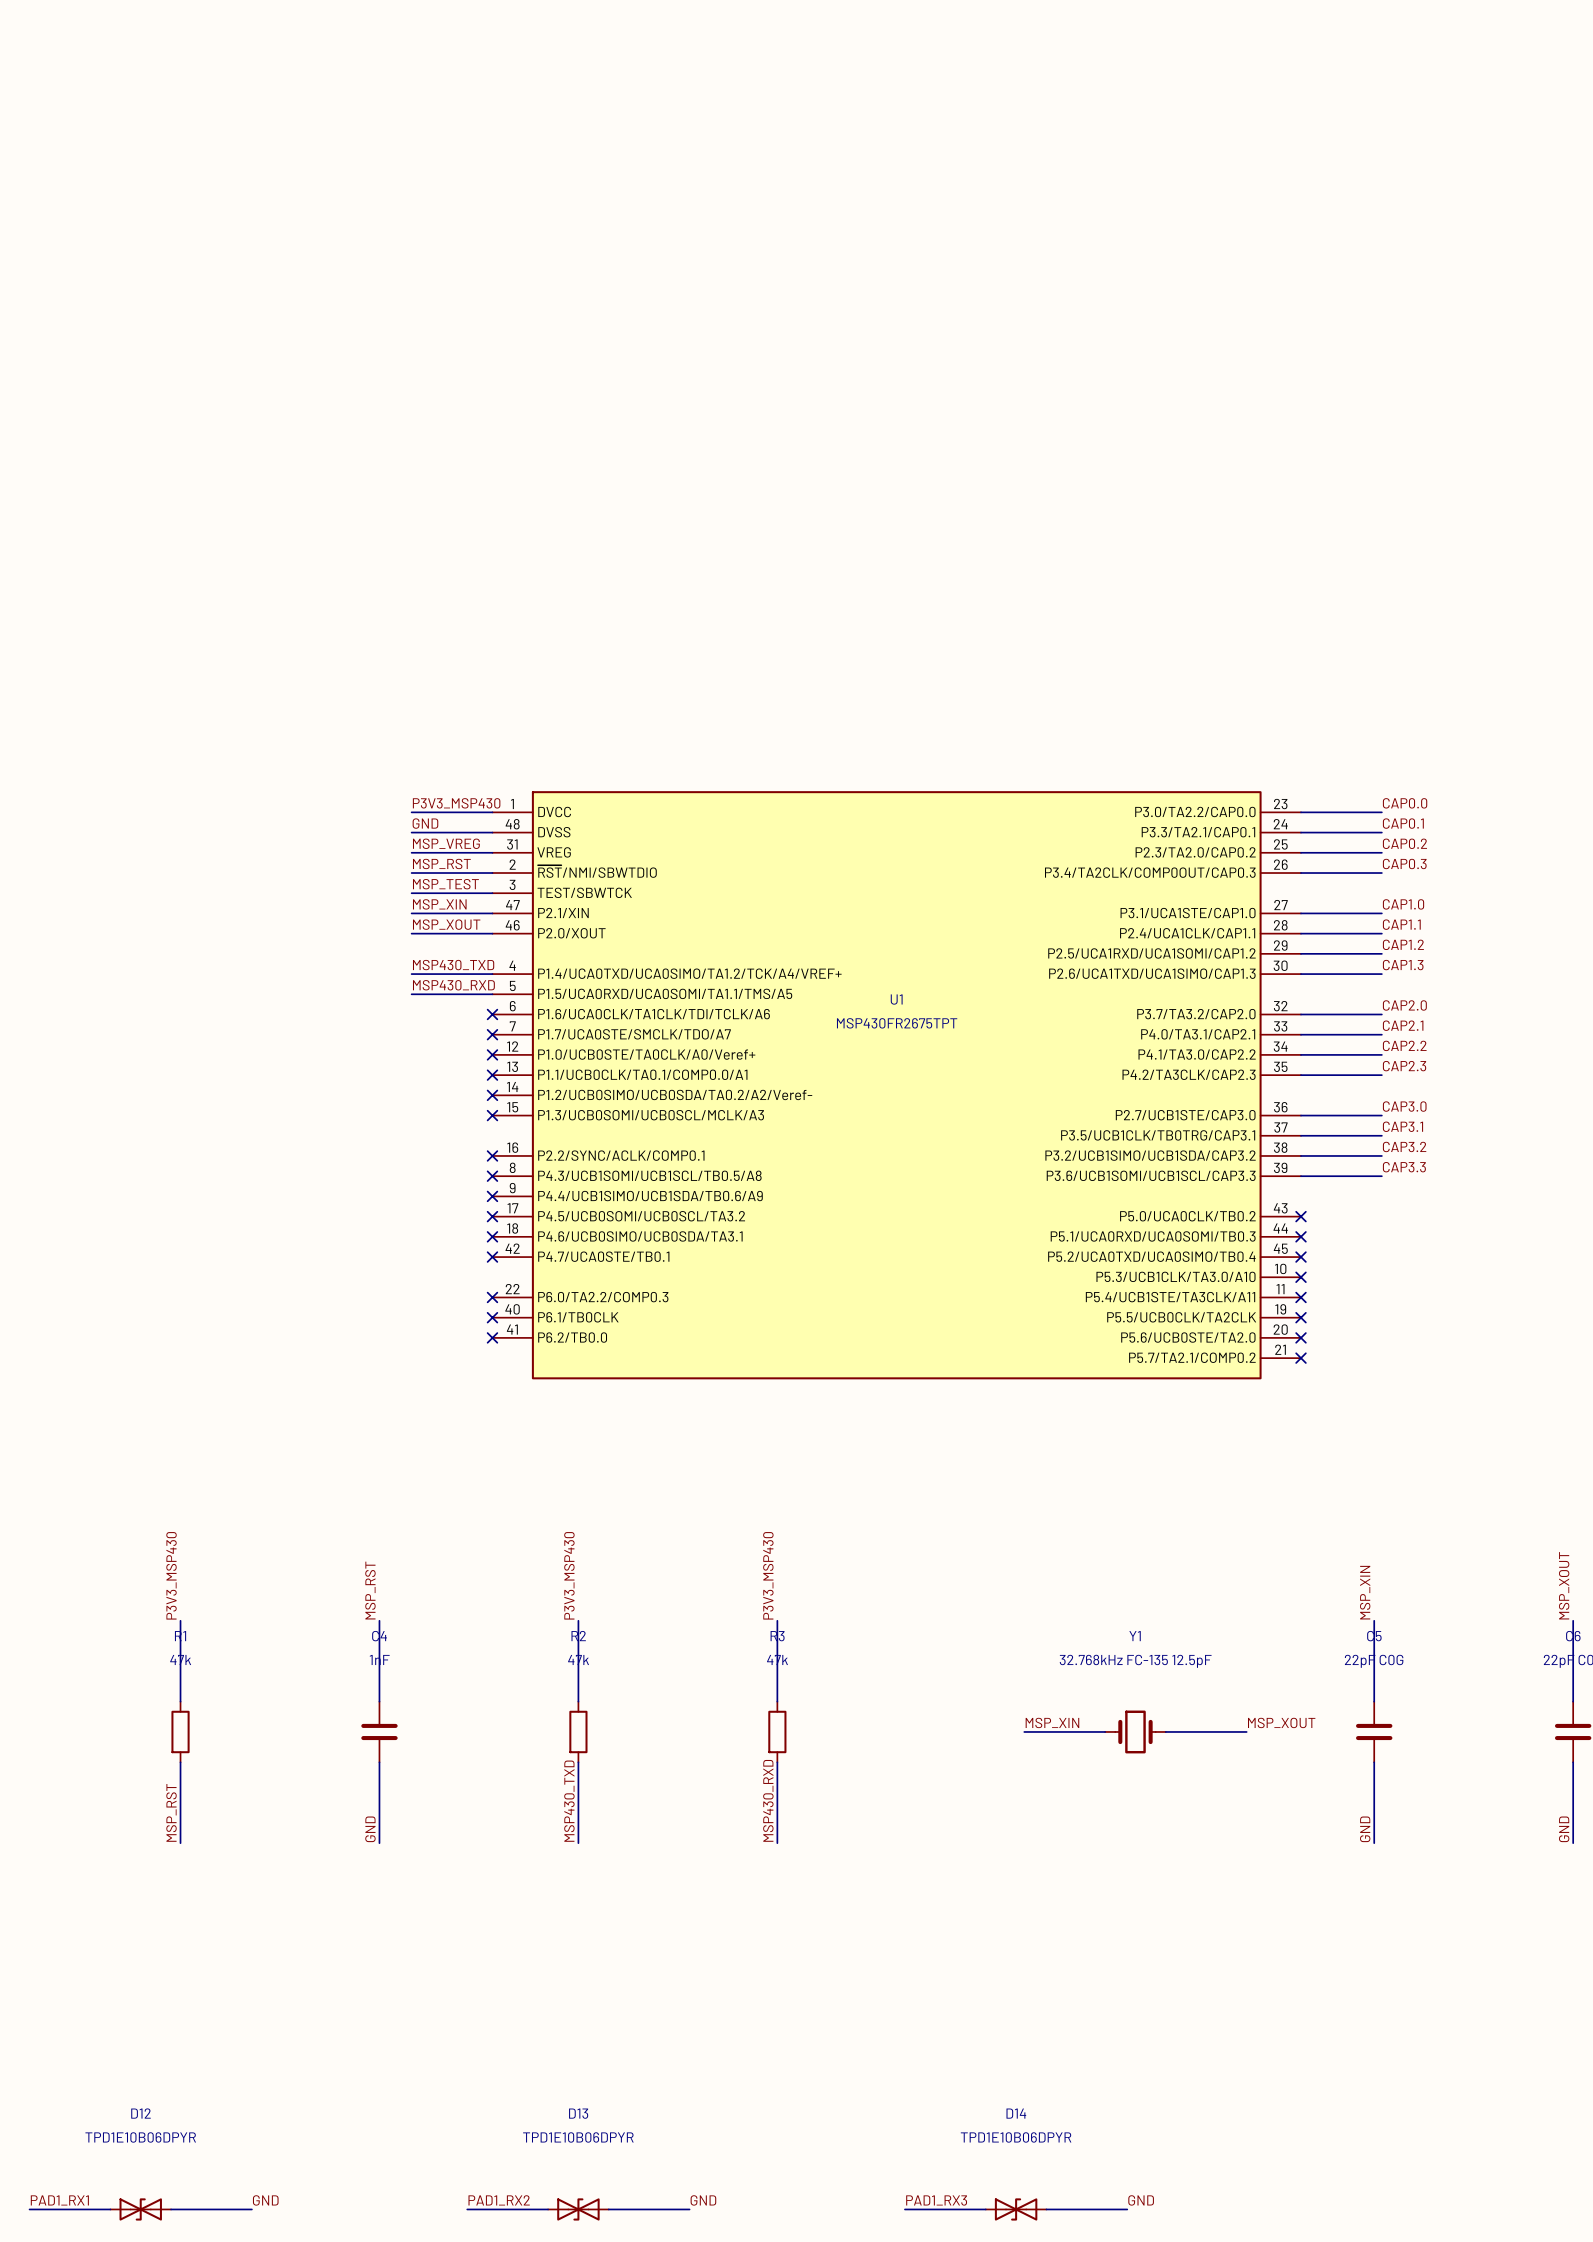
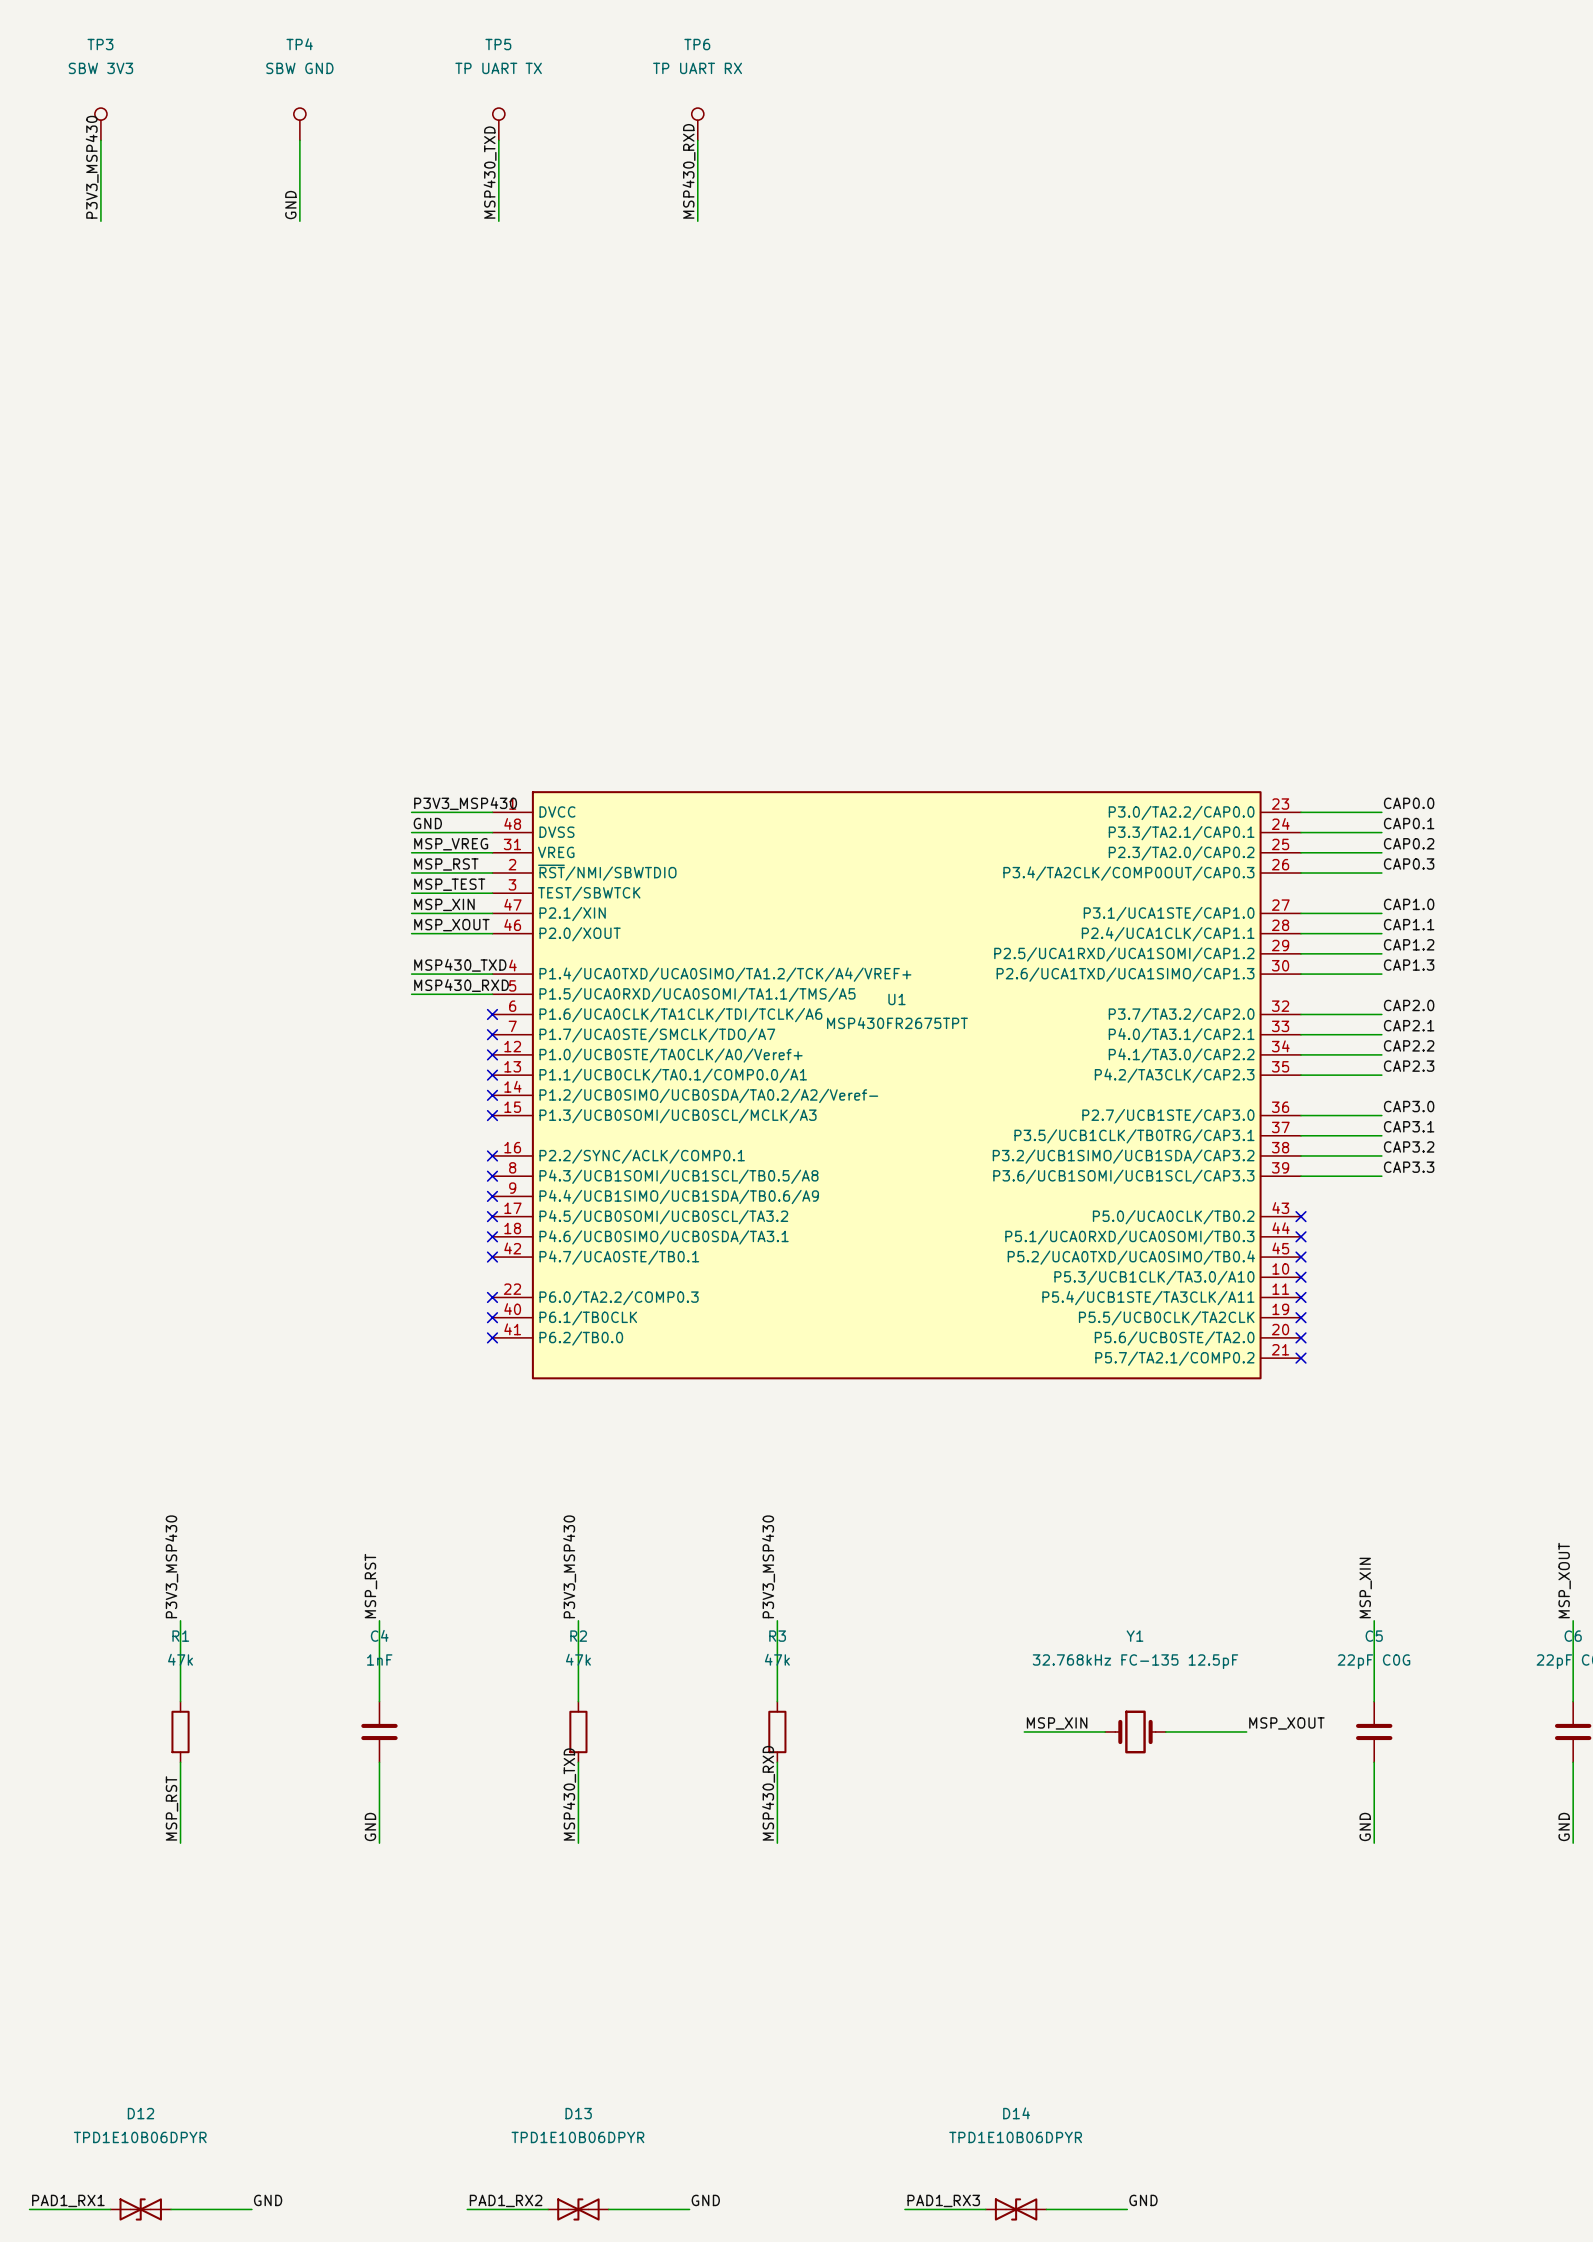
TP3: none -> SBW 3V3 (100, 124)
TP4: none -> SBW GND (299, 124)
TP5: none -> TP UART TX (498, 124)
TP6: none -> TP UART RX (697, 124)
wire: none -> (100, 140) (100, 221)
wire: none -> (299, 140) (299, 221)
wire: none -> (498, 140) (498, 221)
wire: none -> (697, 140) (697, 221)
label: none -> P3V3_MSP430 (92, 167)
label: none -> MSP430_RXD (689, 171)
label: none -> MSP430_TXD (490, 172)
label: none -> GND (290, 205)

